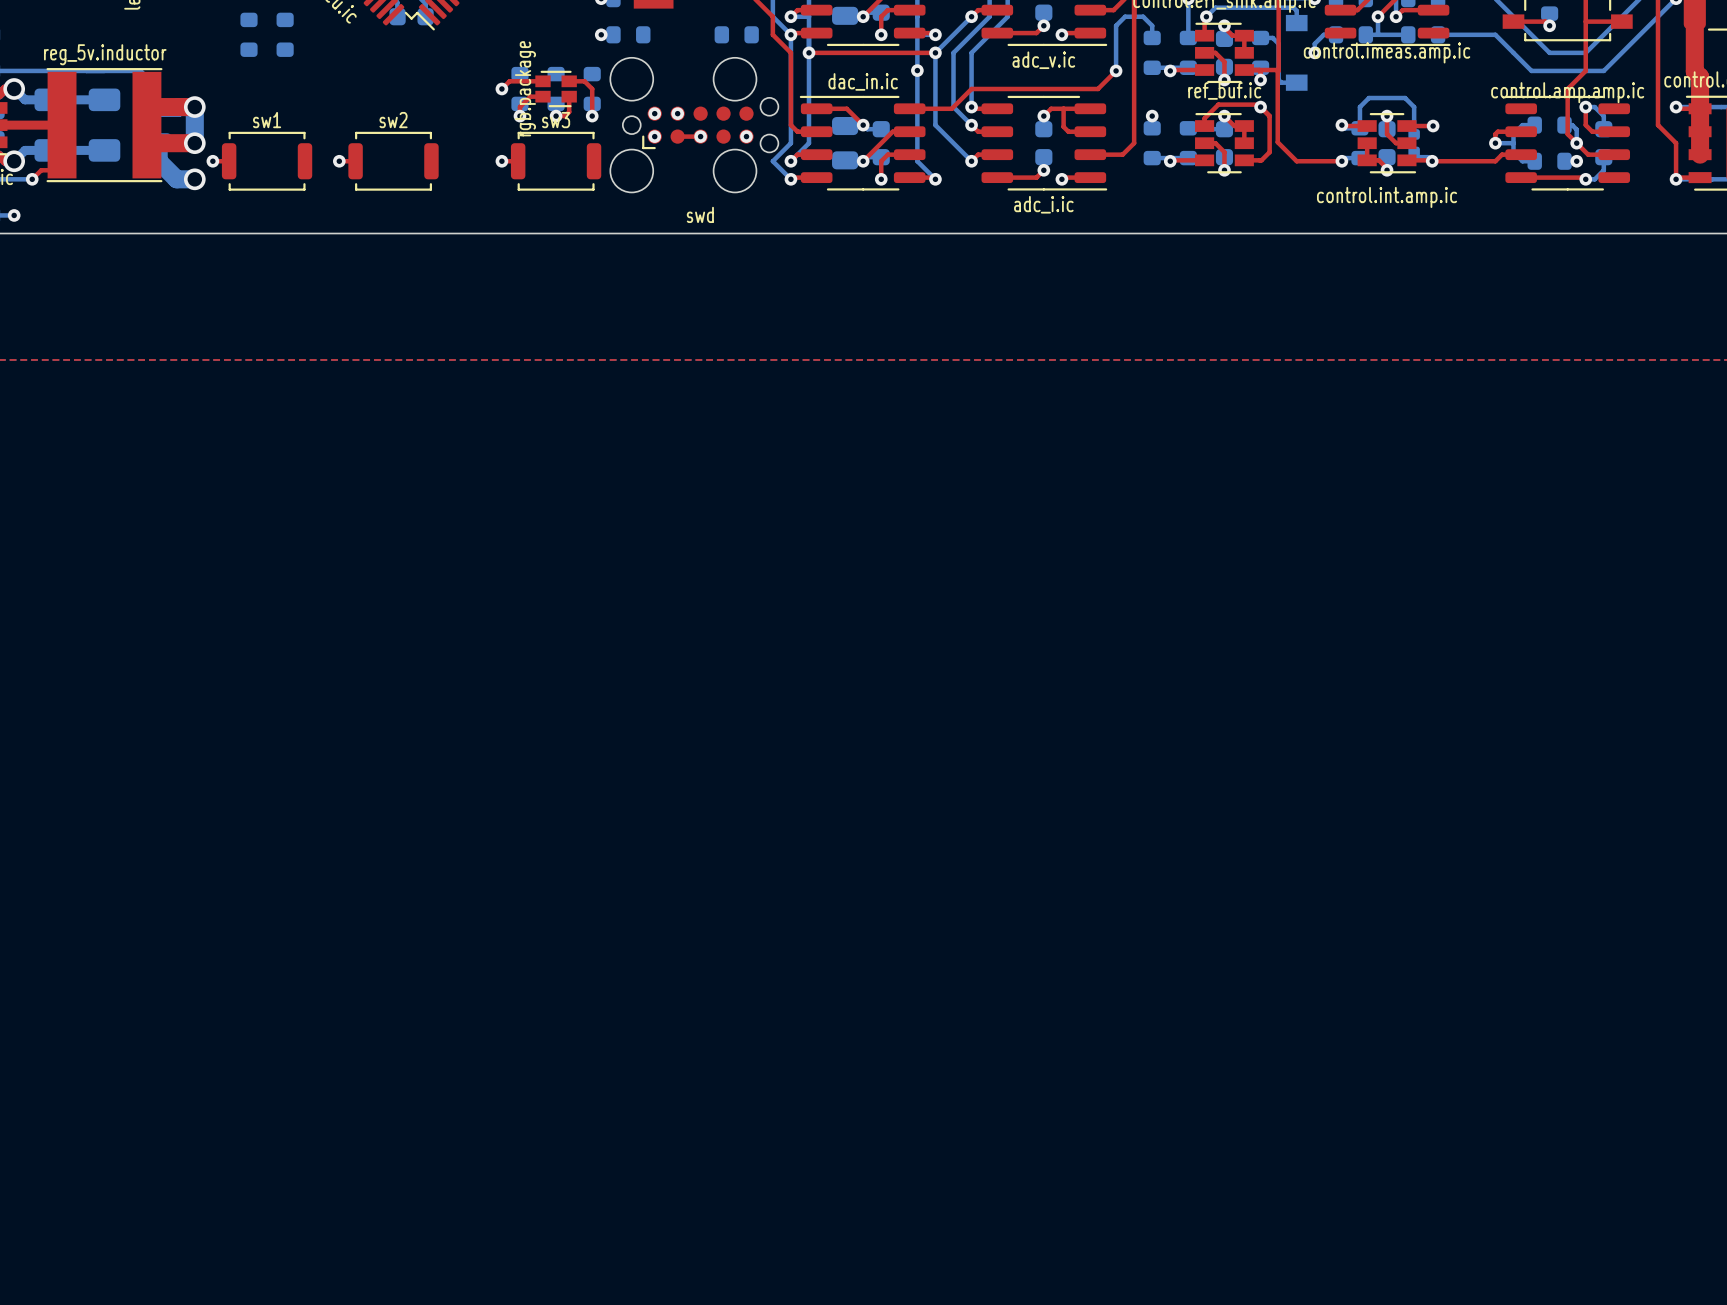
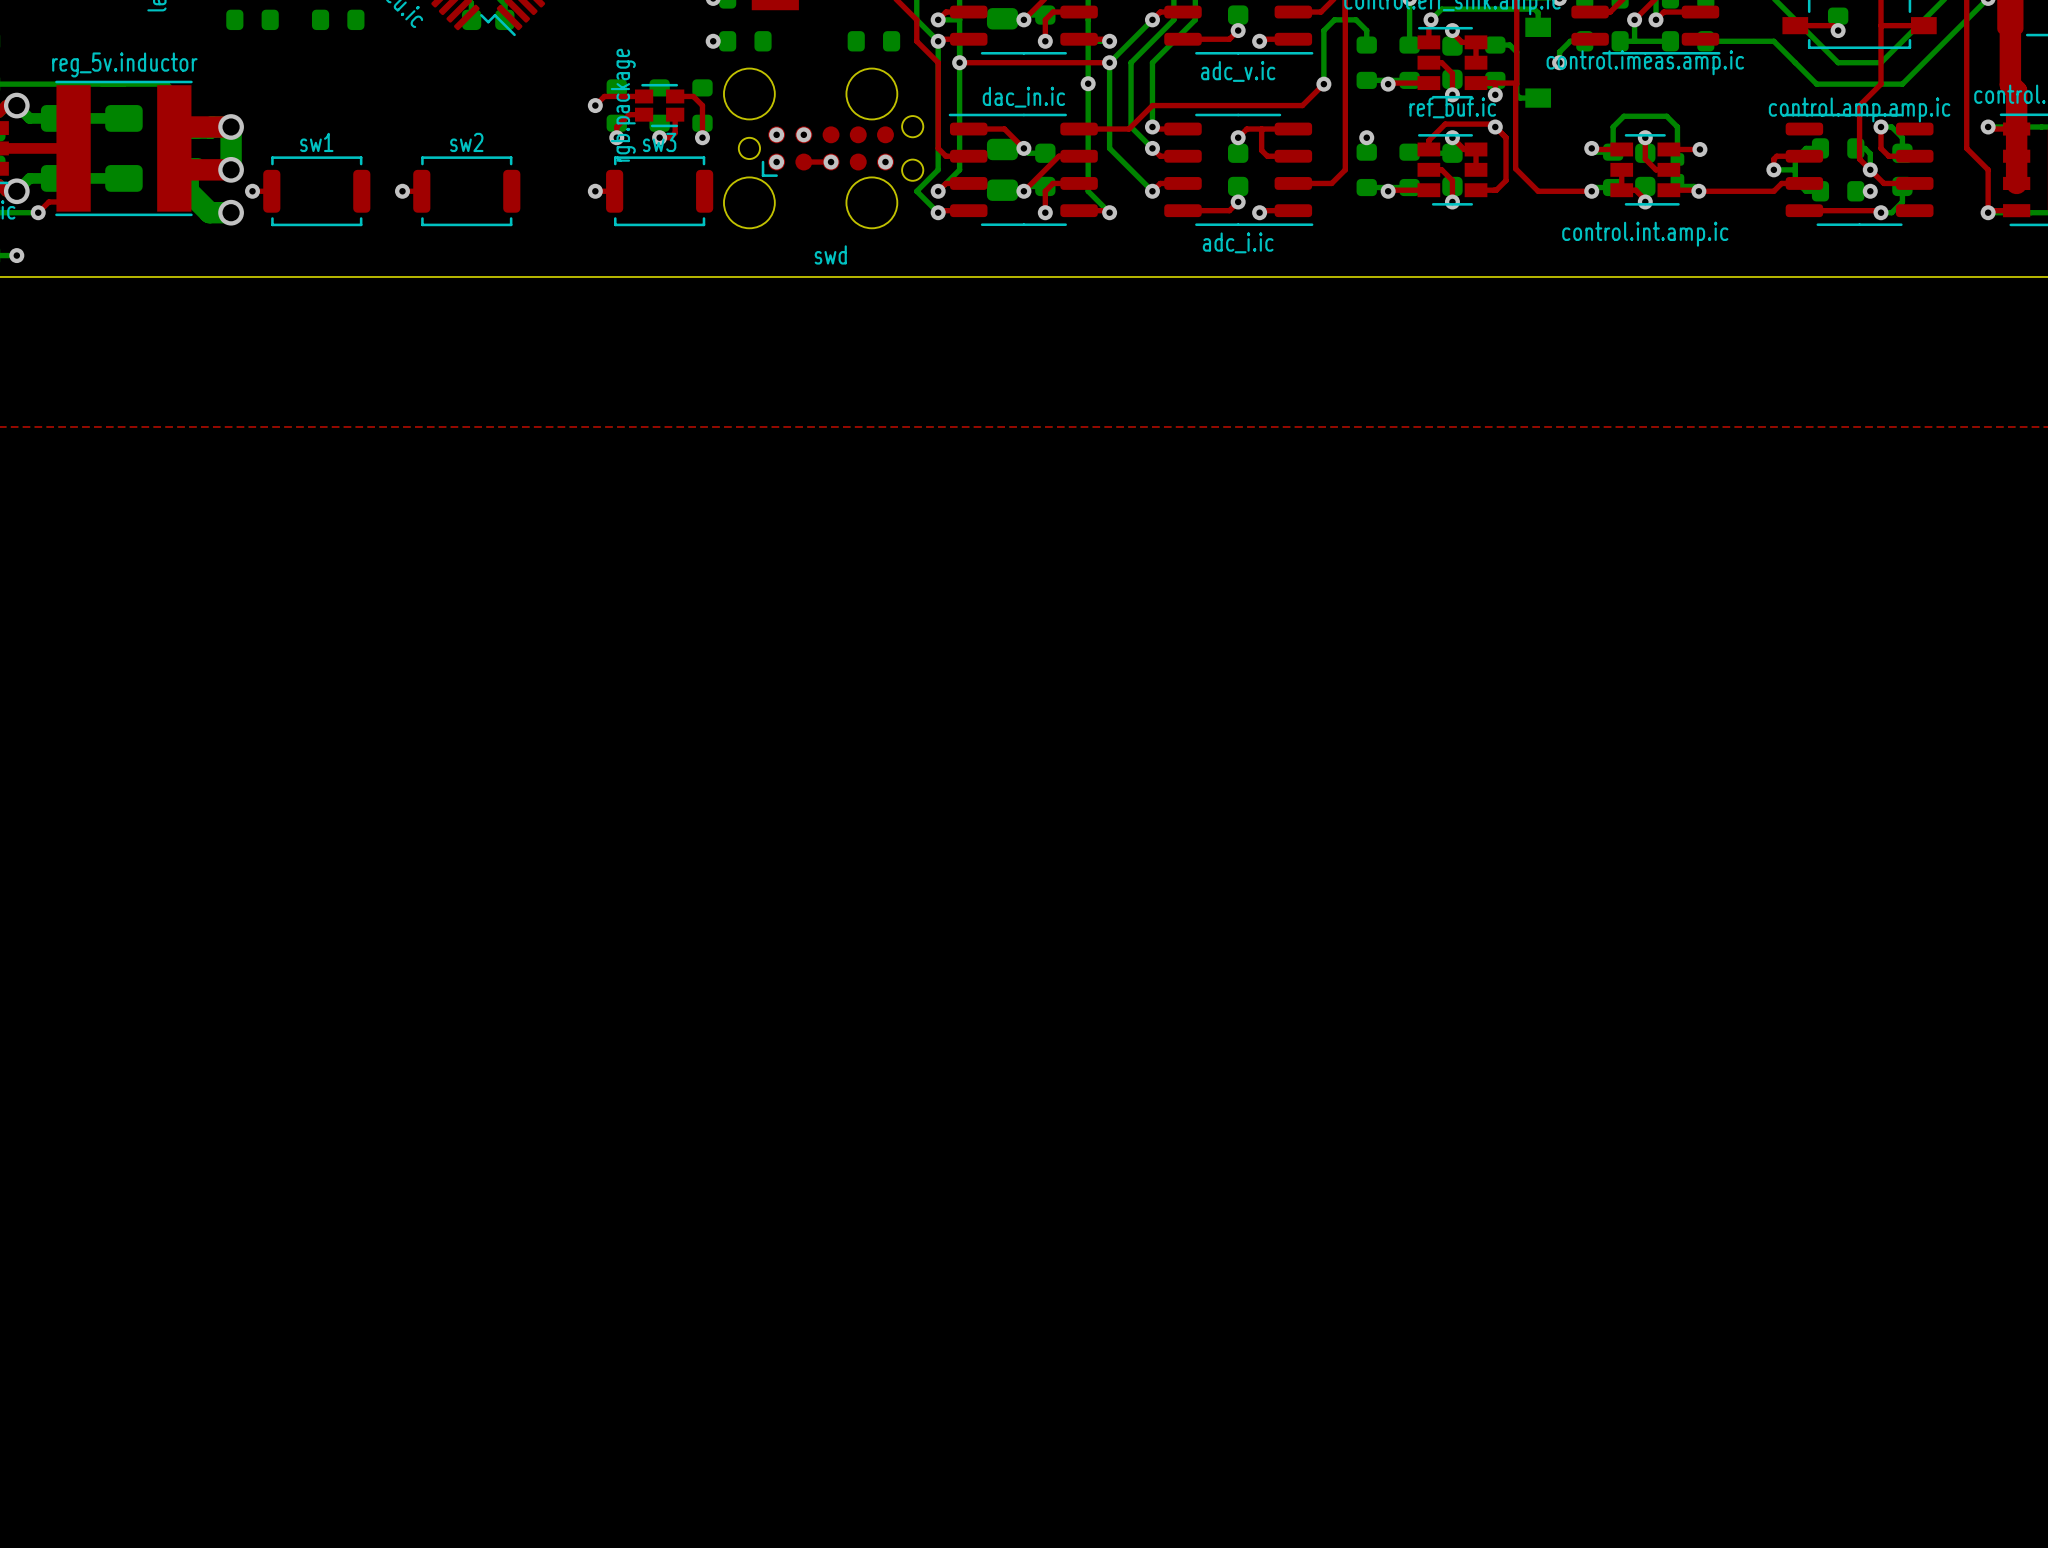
part rotation: 0° (249, 34) -> 90° clockwise (252, 19)
part position: (249, 34) -> (252, 19)
part rotation: 0° (285, 34) -> 90° clockwise (338, 19)

